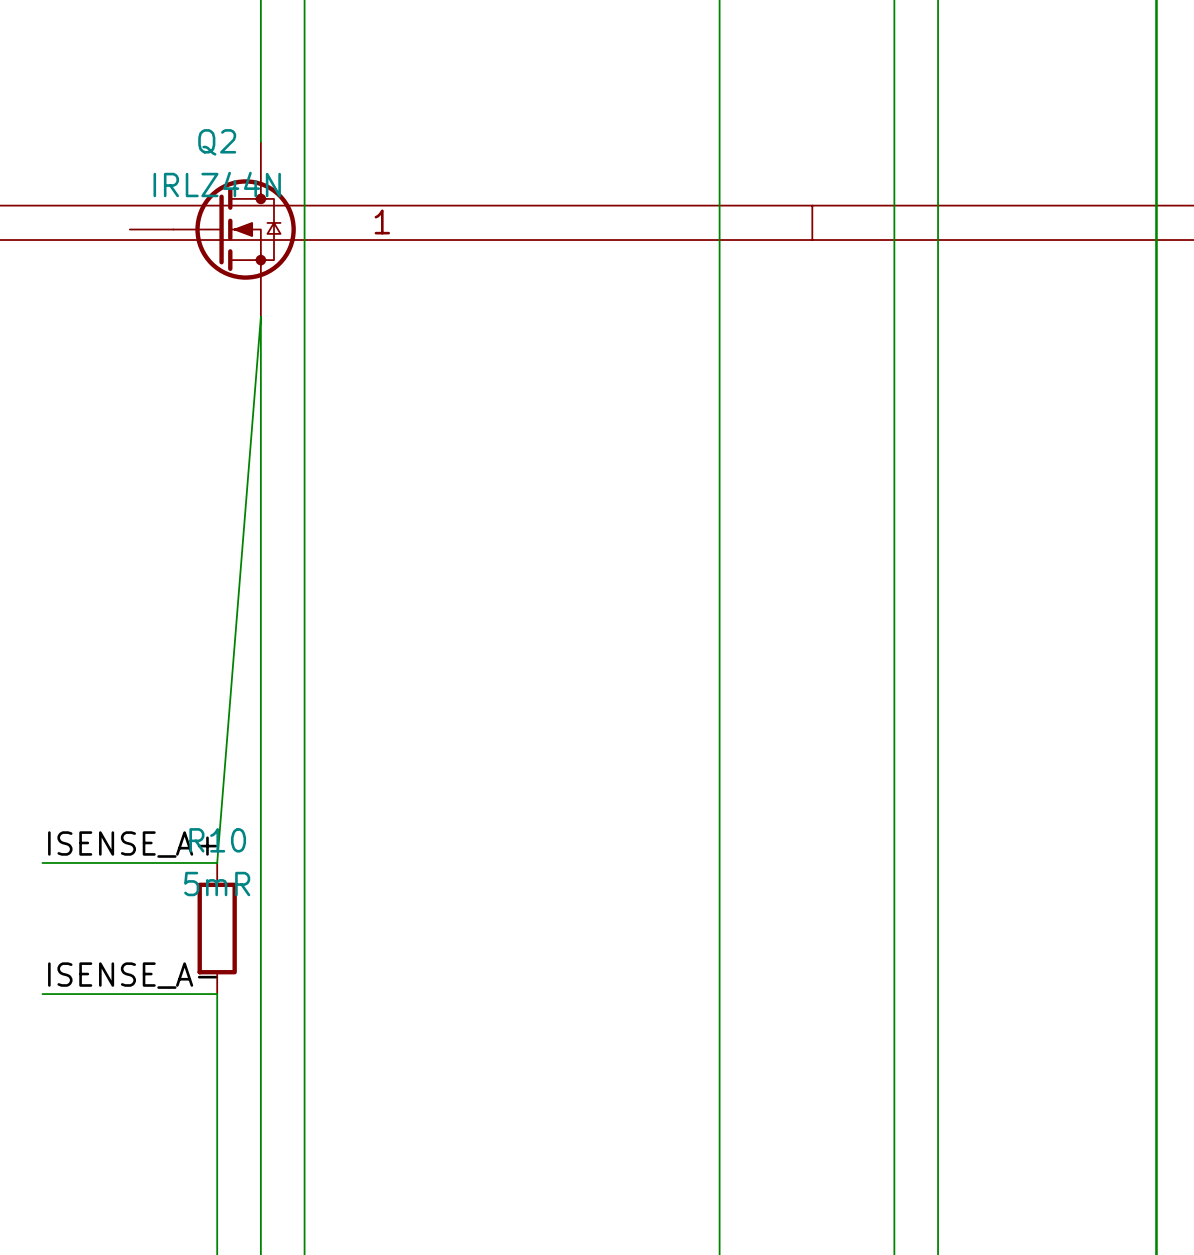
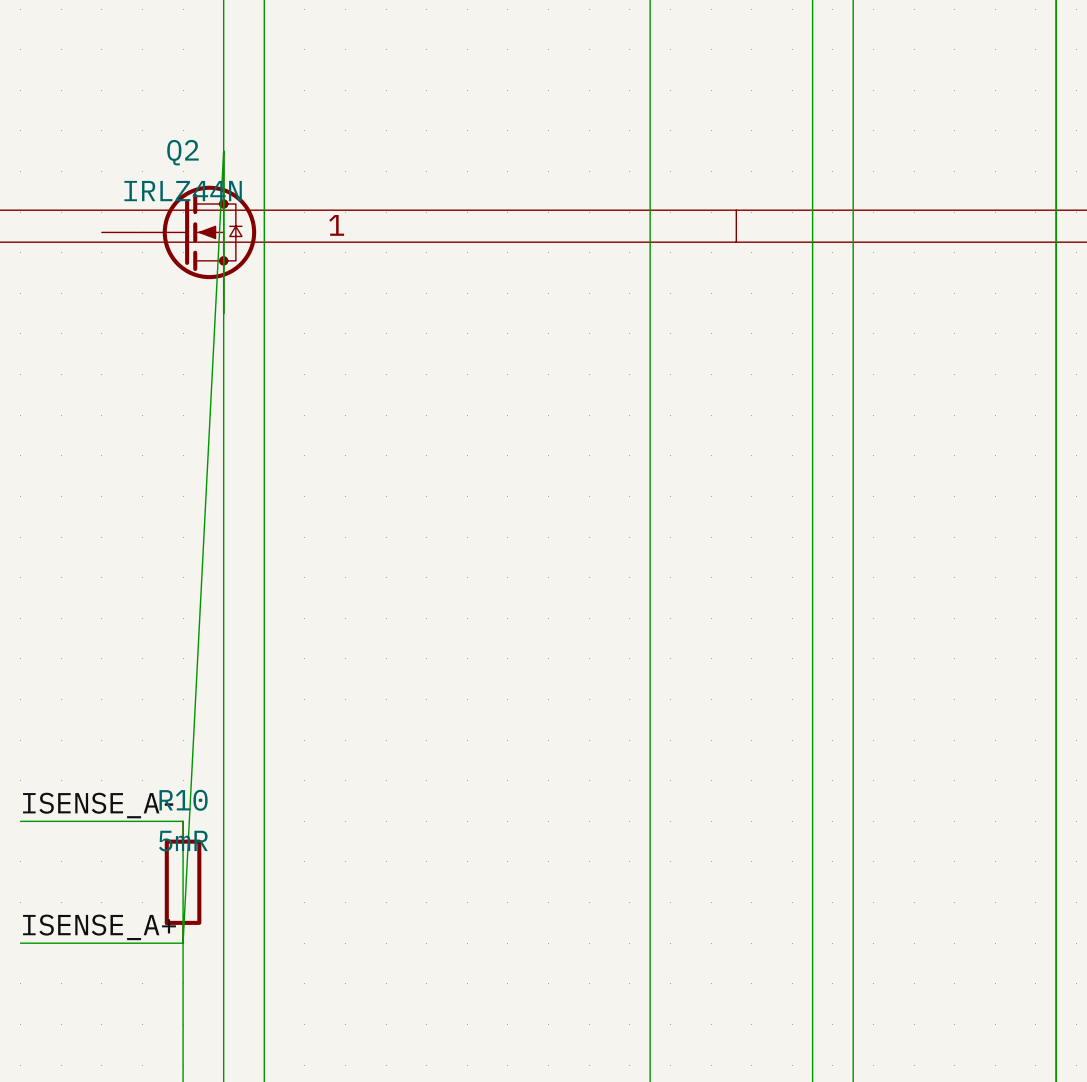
wire: (260, 316) (217, 862) -> (223, 313) (223, 151) (183, 943) (183, 821)
label: ISENSE_A+ (132, 844) -> ISENSE_A- (98, 805)
label: ISENSE_A- (132, 975) -> ISENSE_A+ (99, 927)

